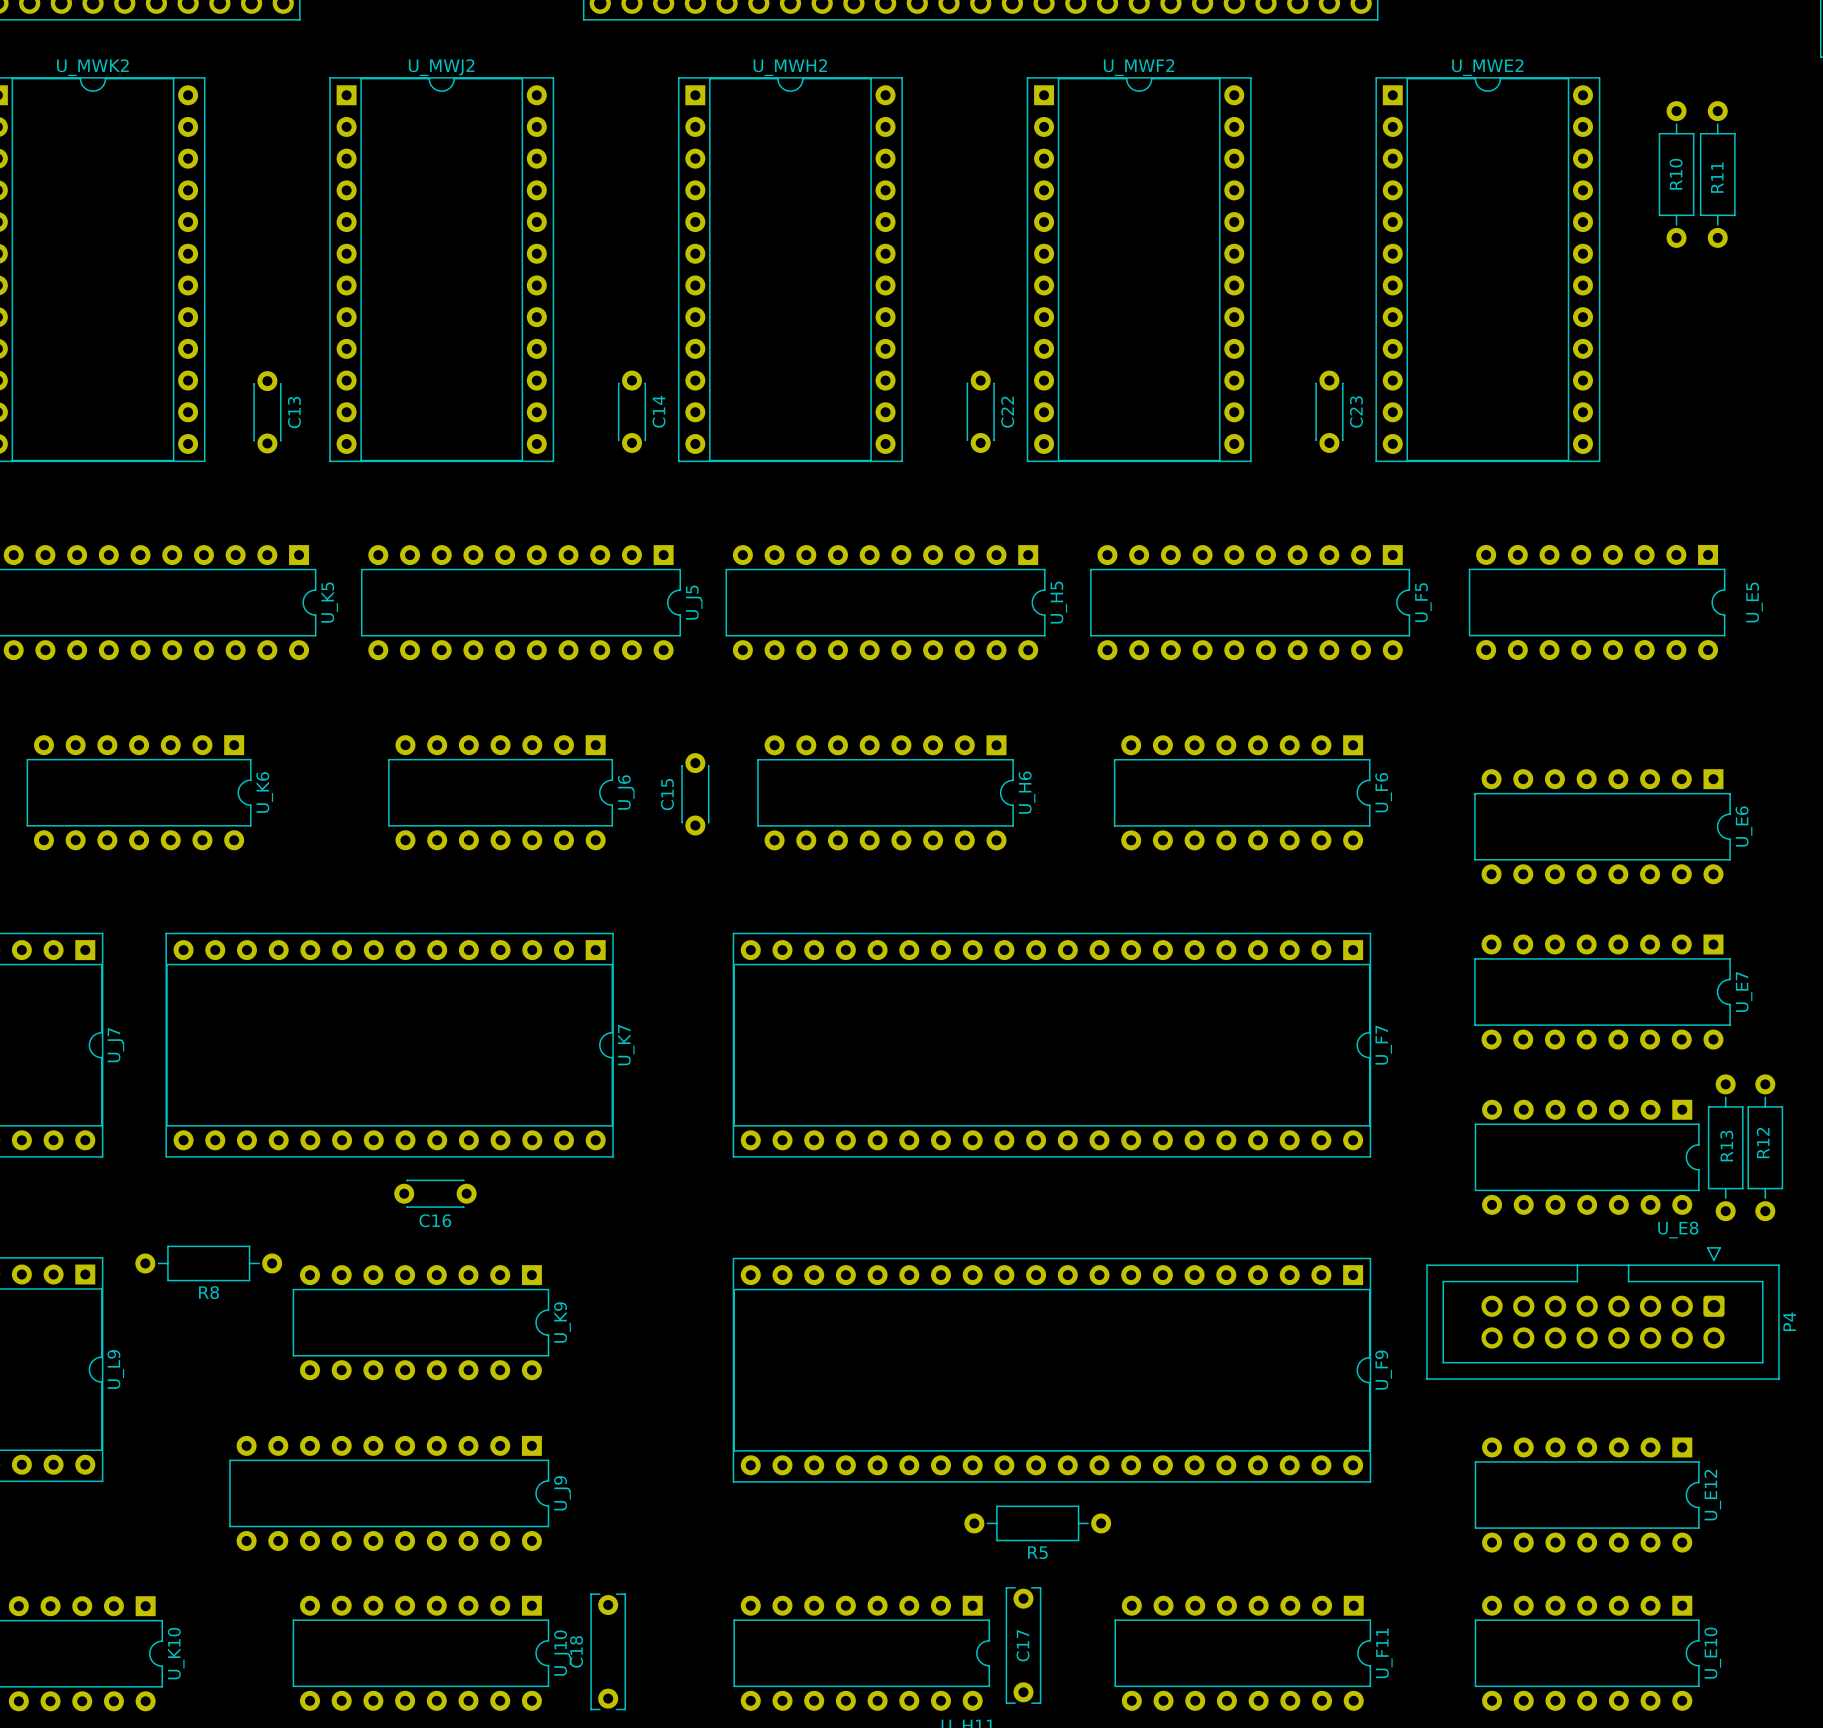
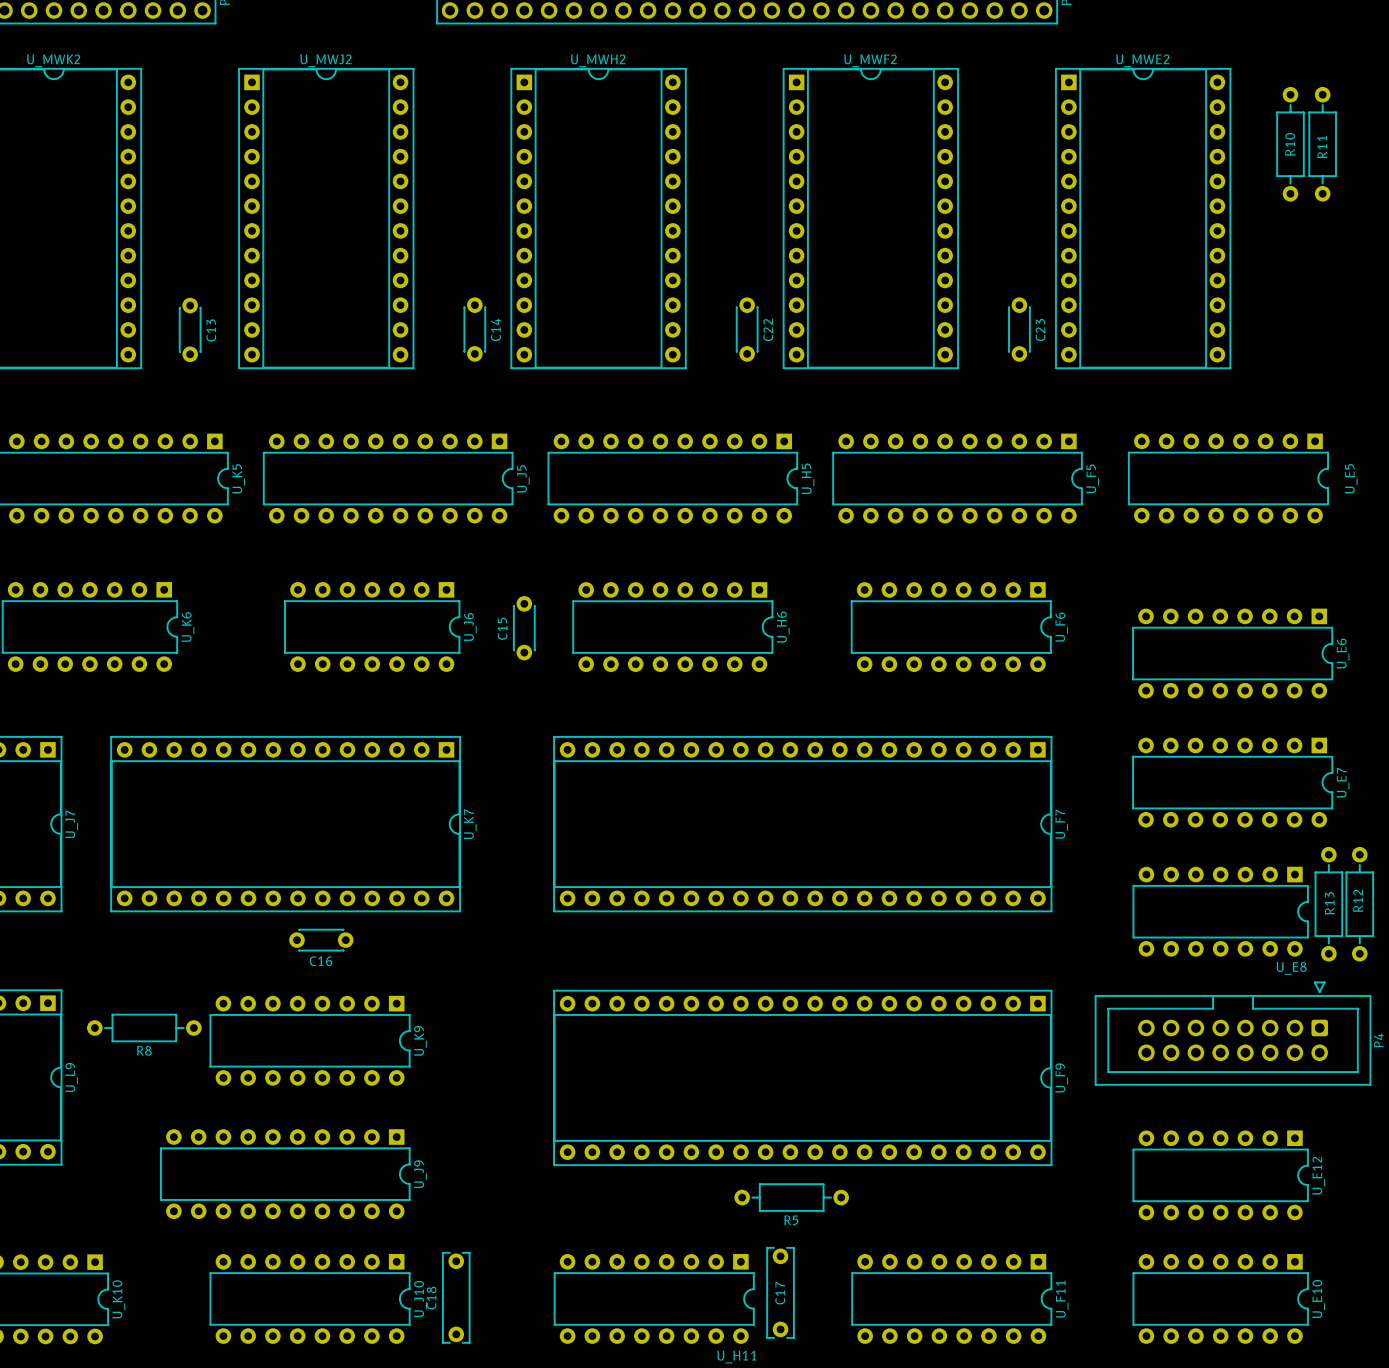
R8 position: (208, 1263) -> (144, 1027)

